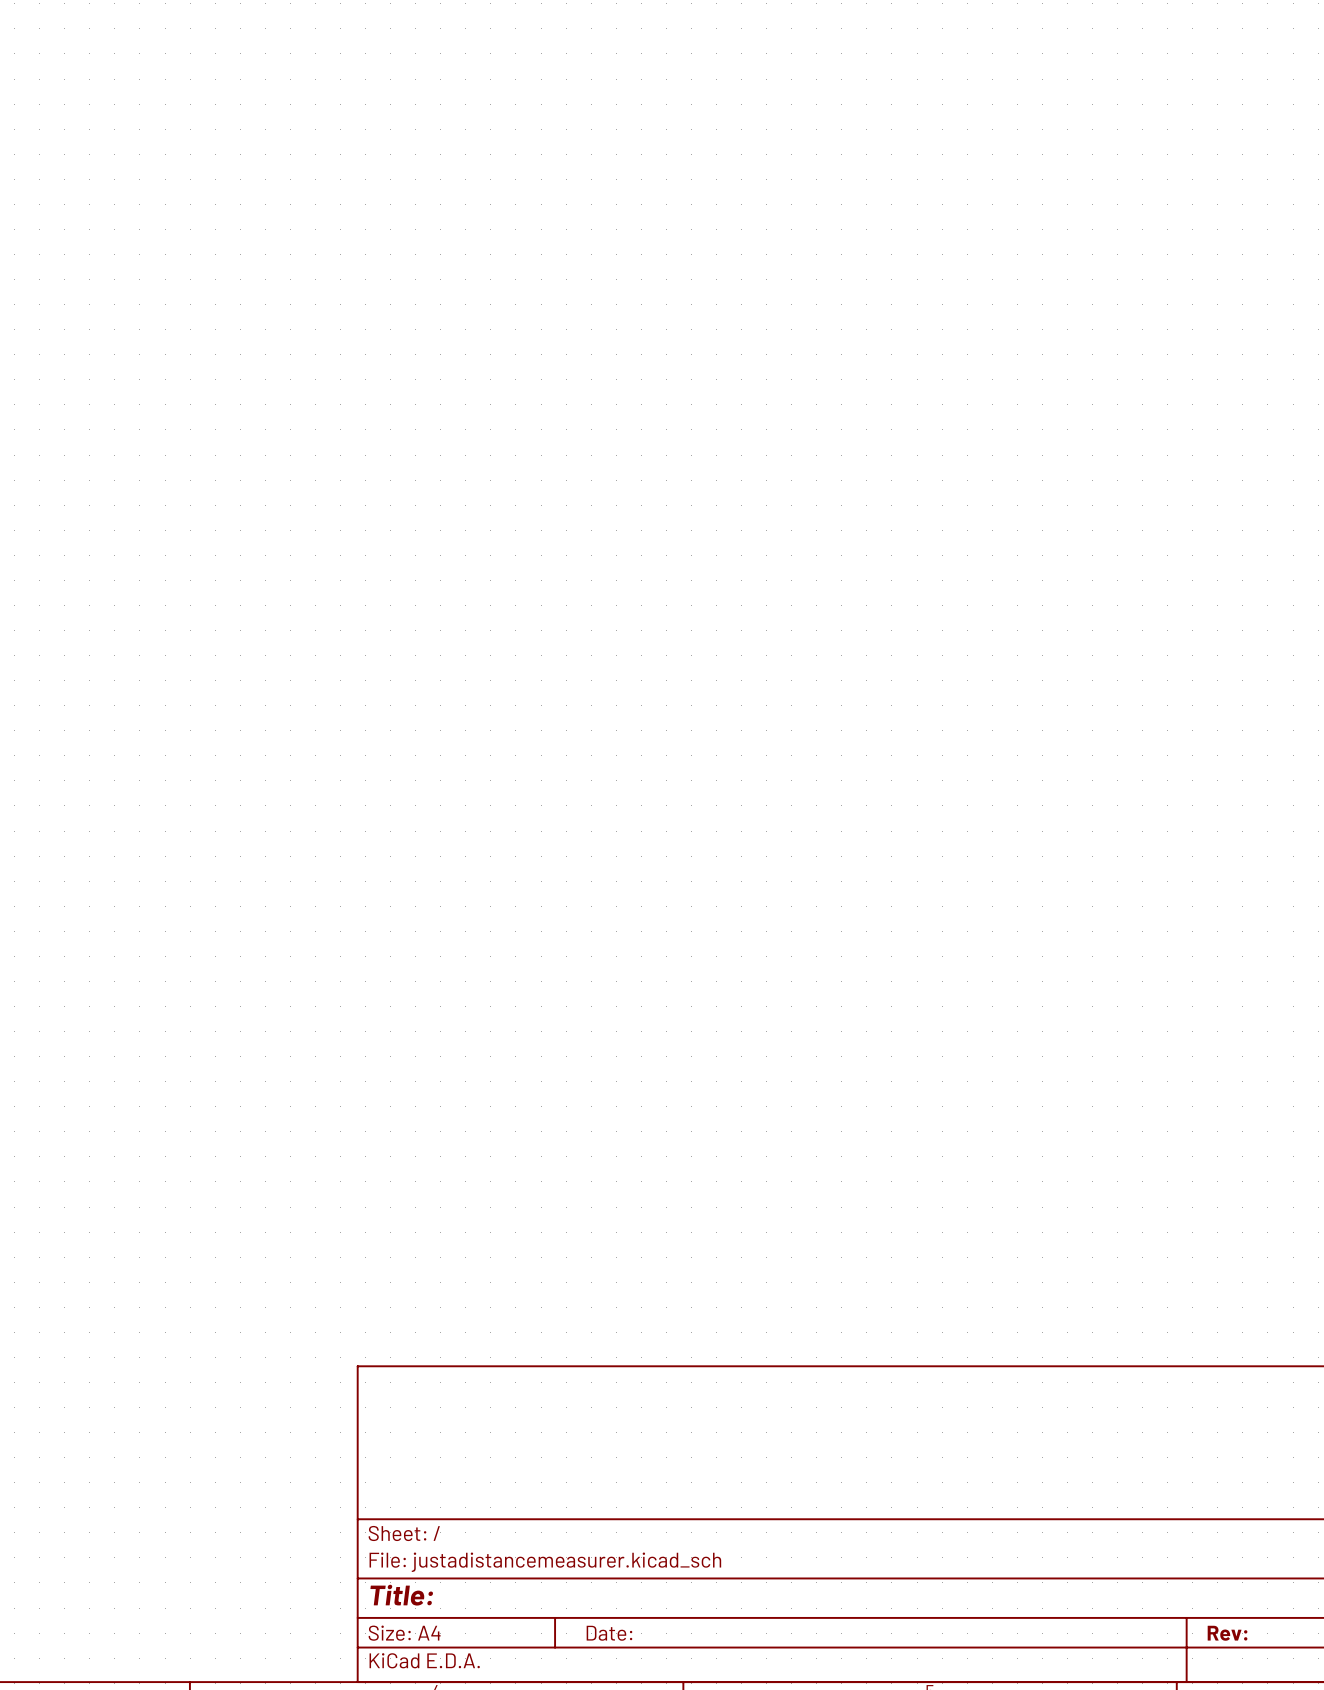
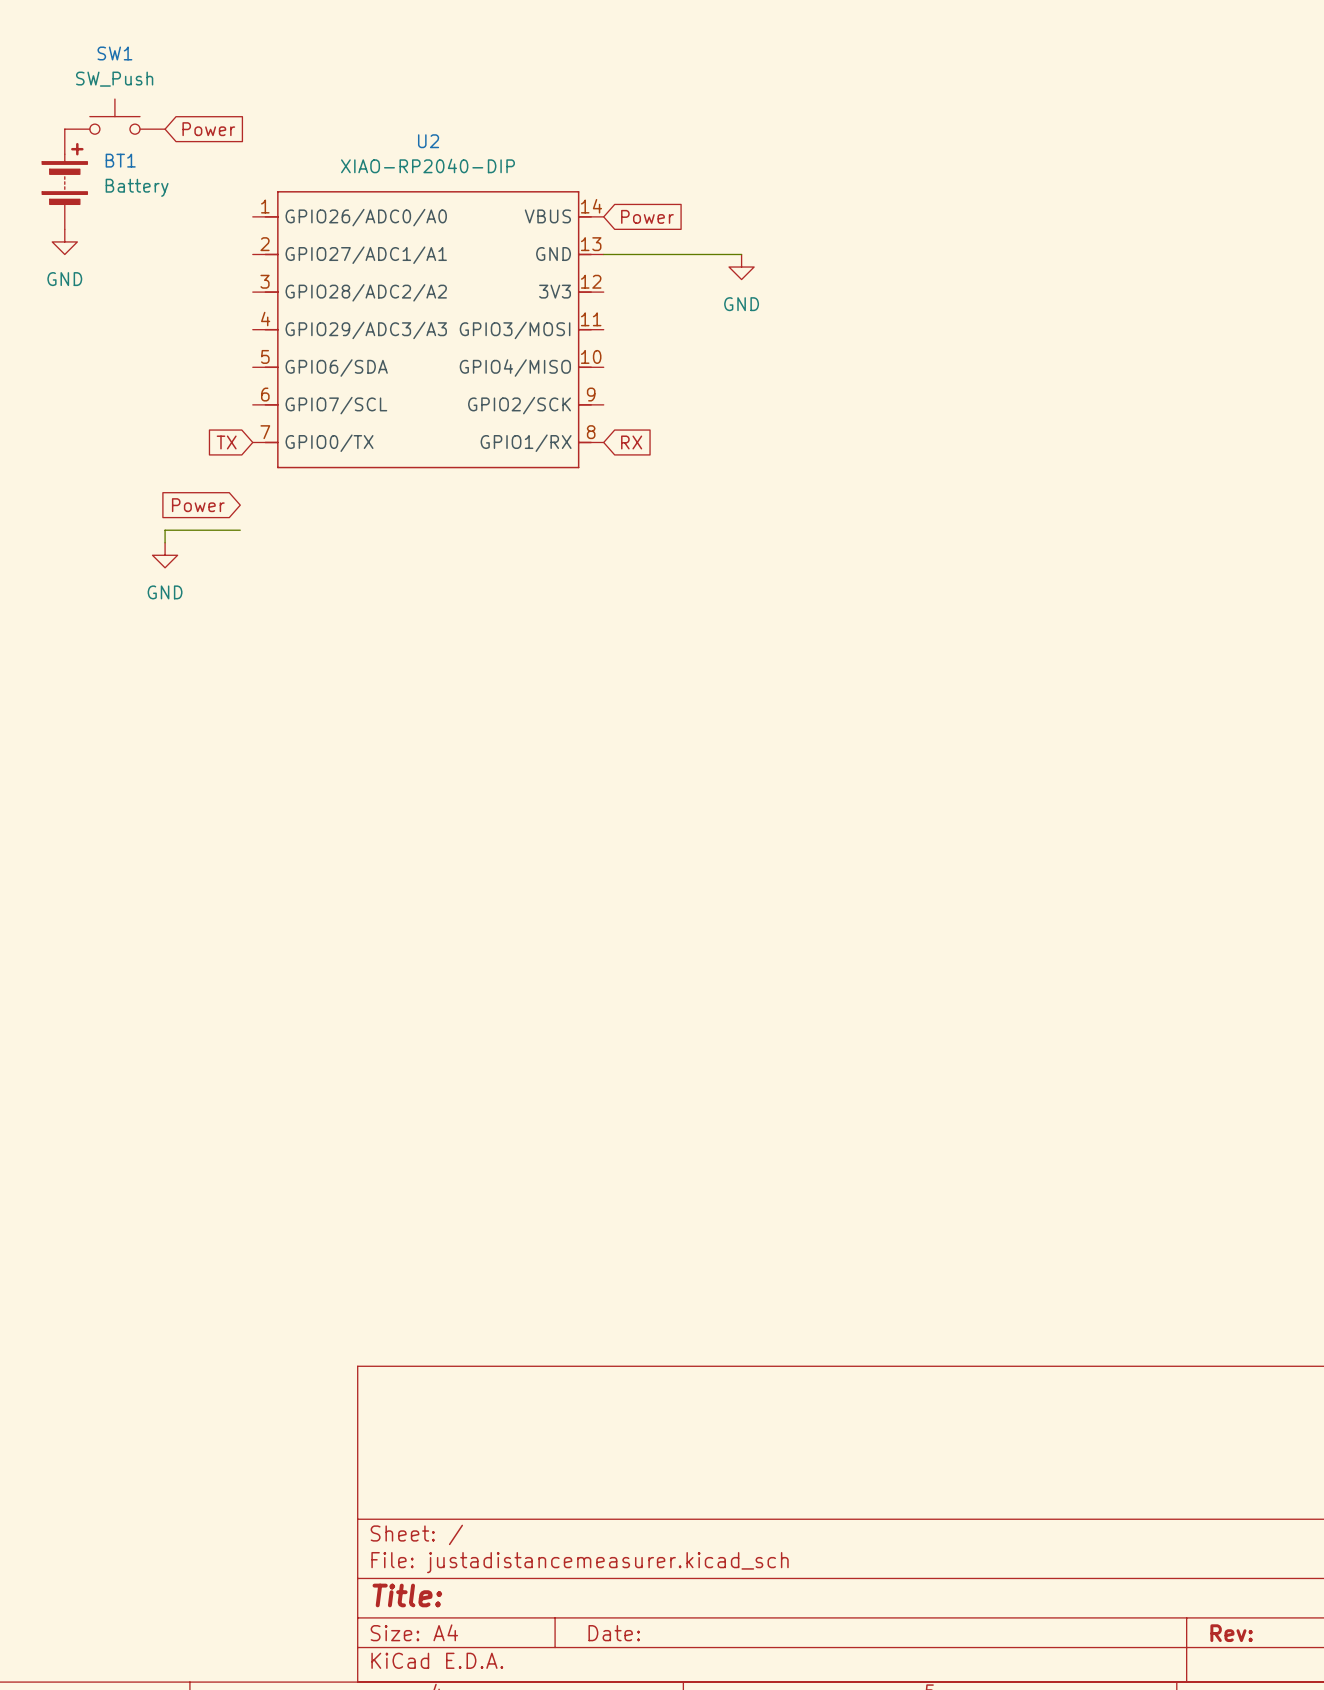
SW1: none -> SW_Push (114, 116)
global label: none -> Power (208, 129)
BT1: none -> Battery (64, 179)
global label: none -> Power (647, 216)
power symbol: none -> GND (64, 241)
wire: none -> (603, 254) (741, 254)
power symbol: none -> GND (741, 267)
U2: none -> XIAO-RP2040-DIP (428, 329)
global label: none -> TX (226, 442)
global label: none -> RX (631, 442)
global label: none -> Power (198, 505)
wire: none -> (240, 530) (165, 530) (165, 542)
power symbol: none -> GND (165, 555)

